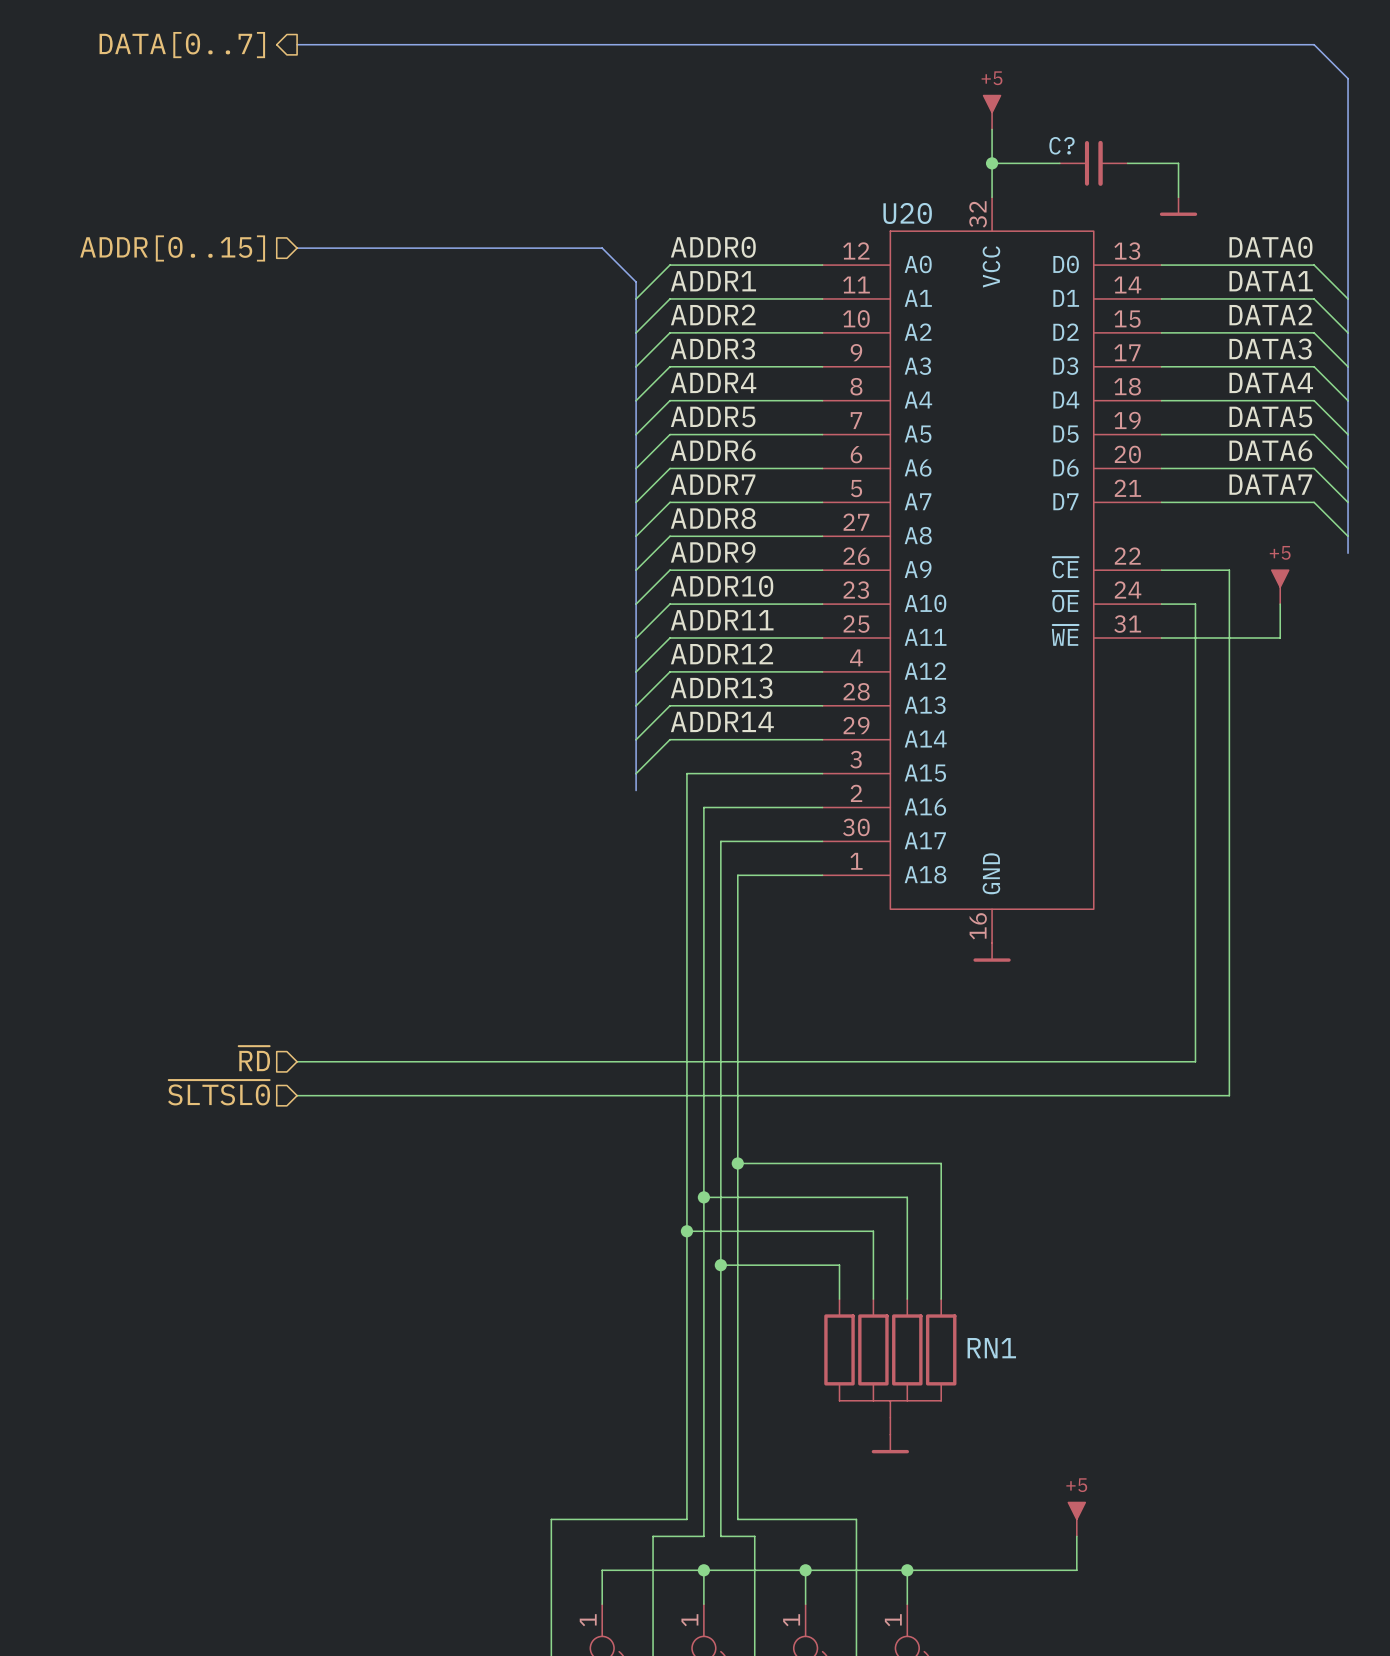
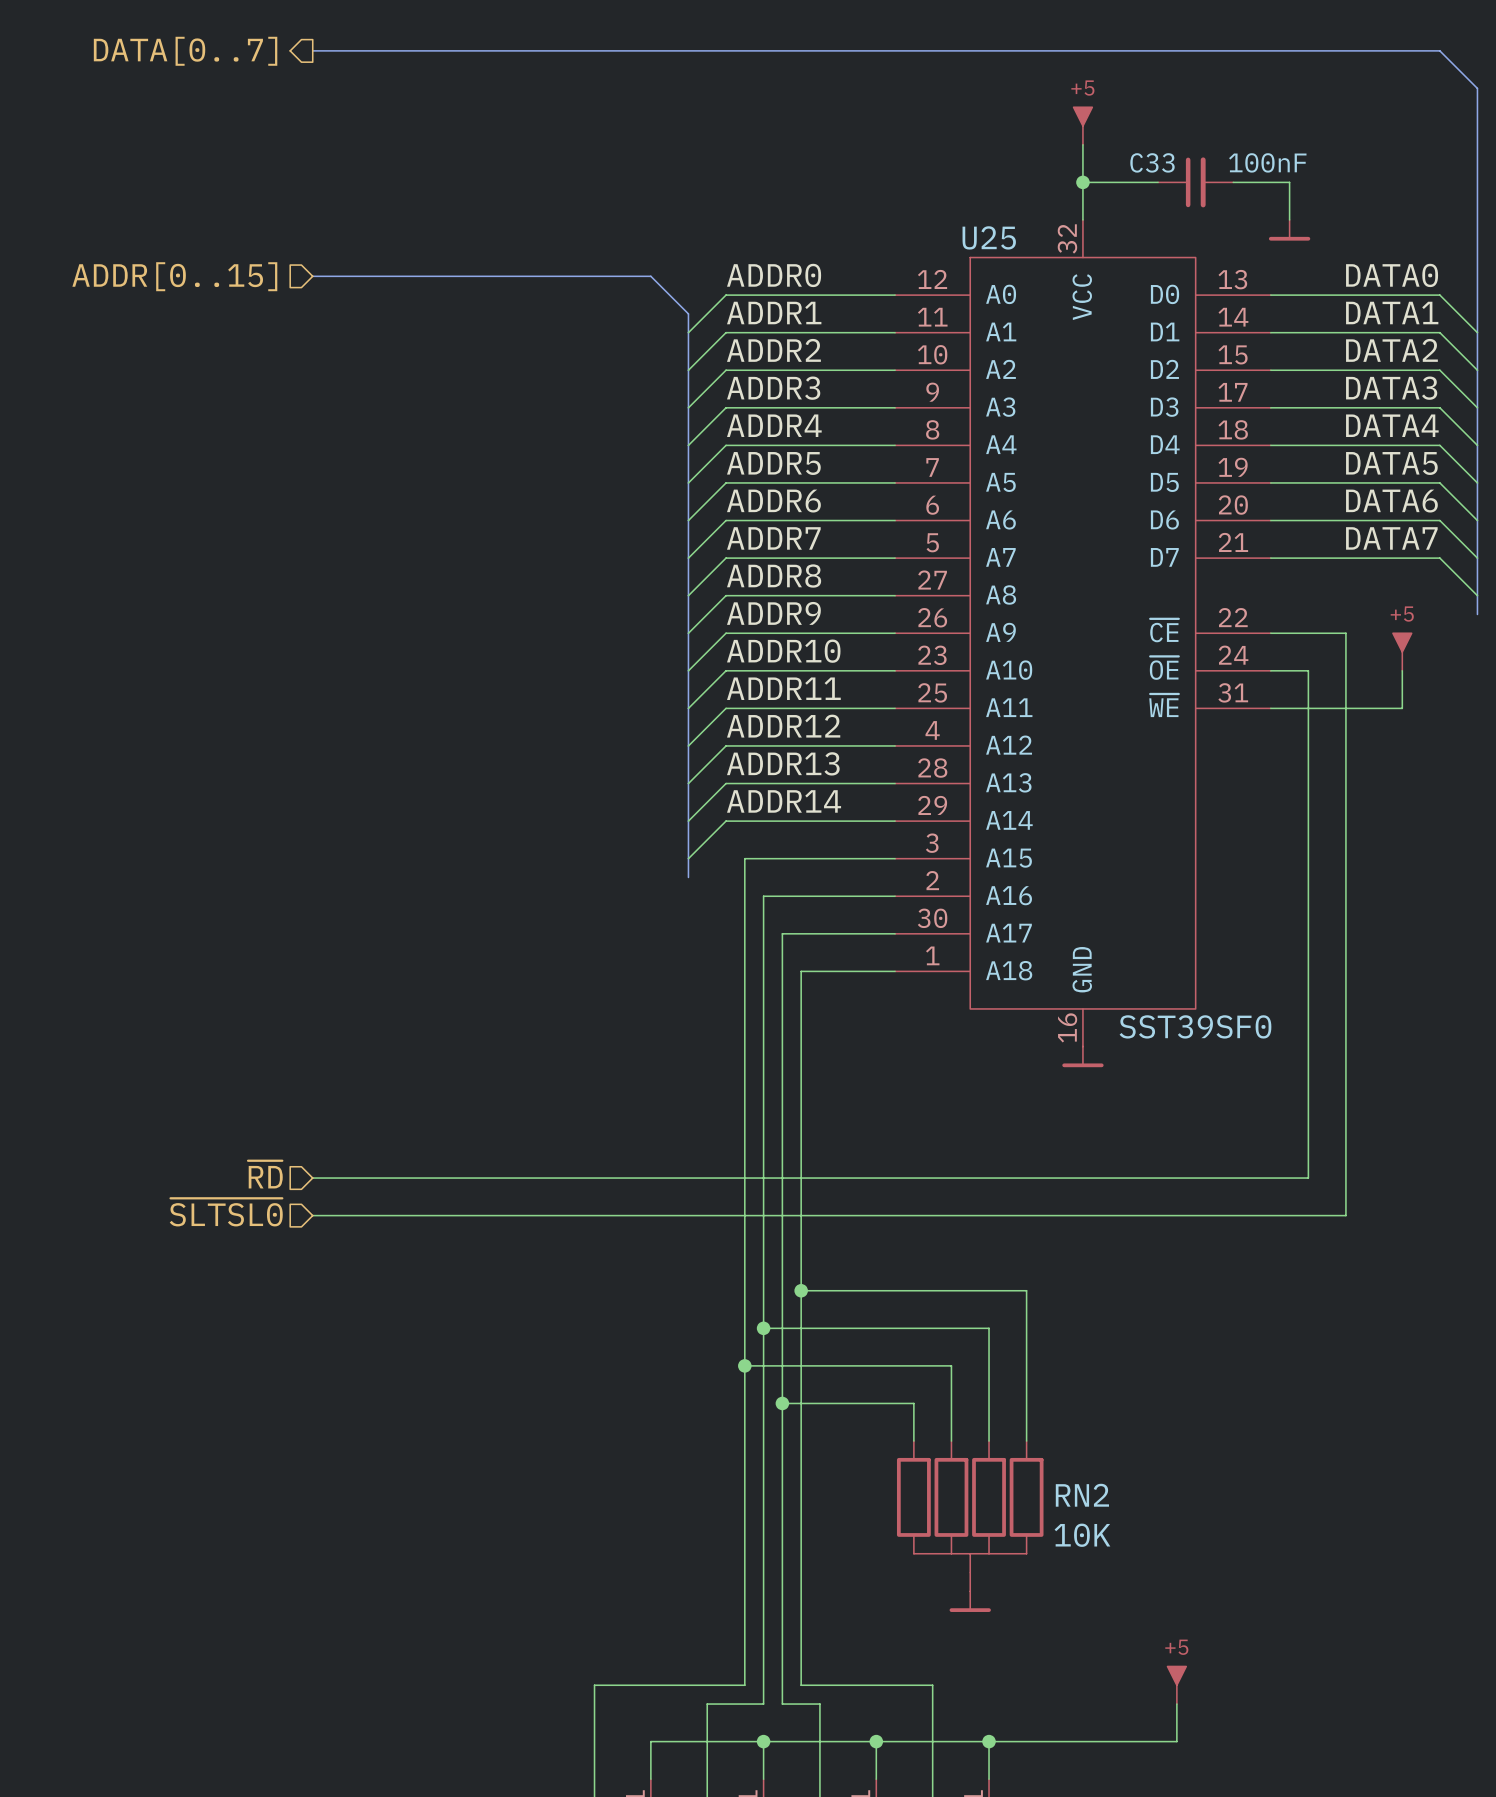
C? name: C? (1062, 145) -> C33 (1152, 162)
C? value: none -> 100nF (1267, 162)
U20 name: U20 (907, 213) -> U25 (989, 237)
U20 value: none -> SST39SF0 (1195, 1026)
RN1 name: RN1 (991, 1348) -> RN2 (1082, 1495)
RN1 value: none -> 10K (1082, 1535)

